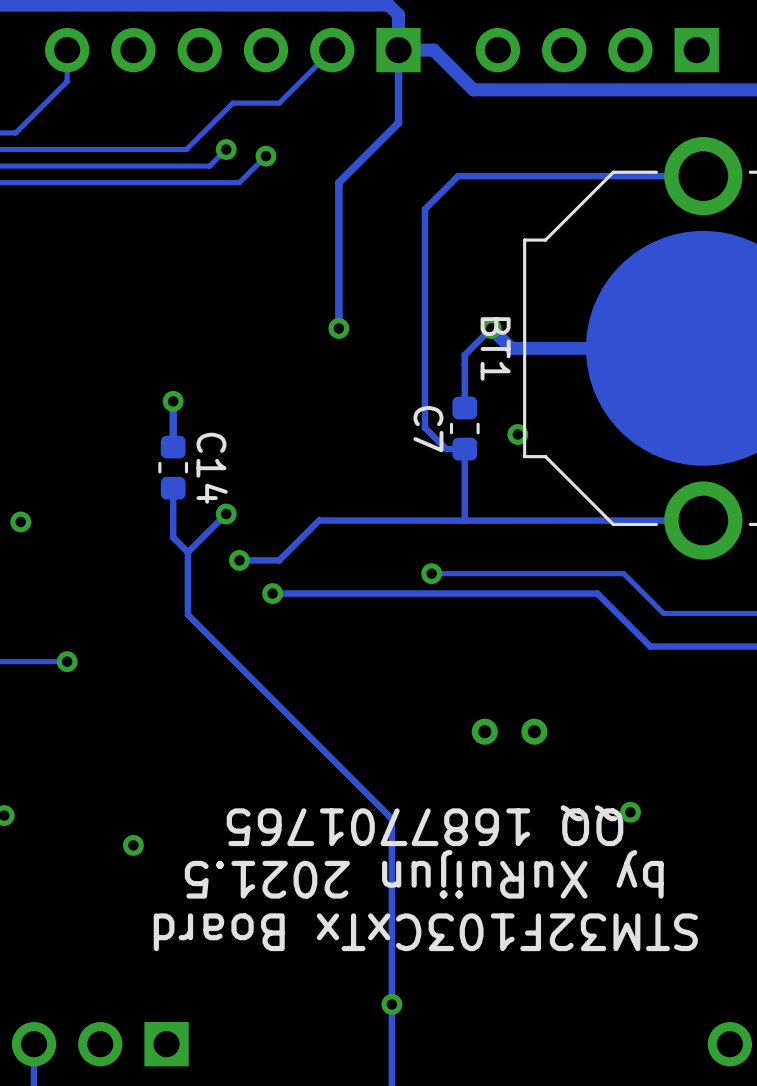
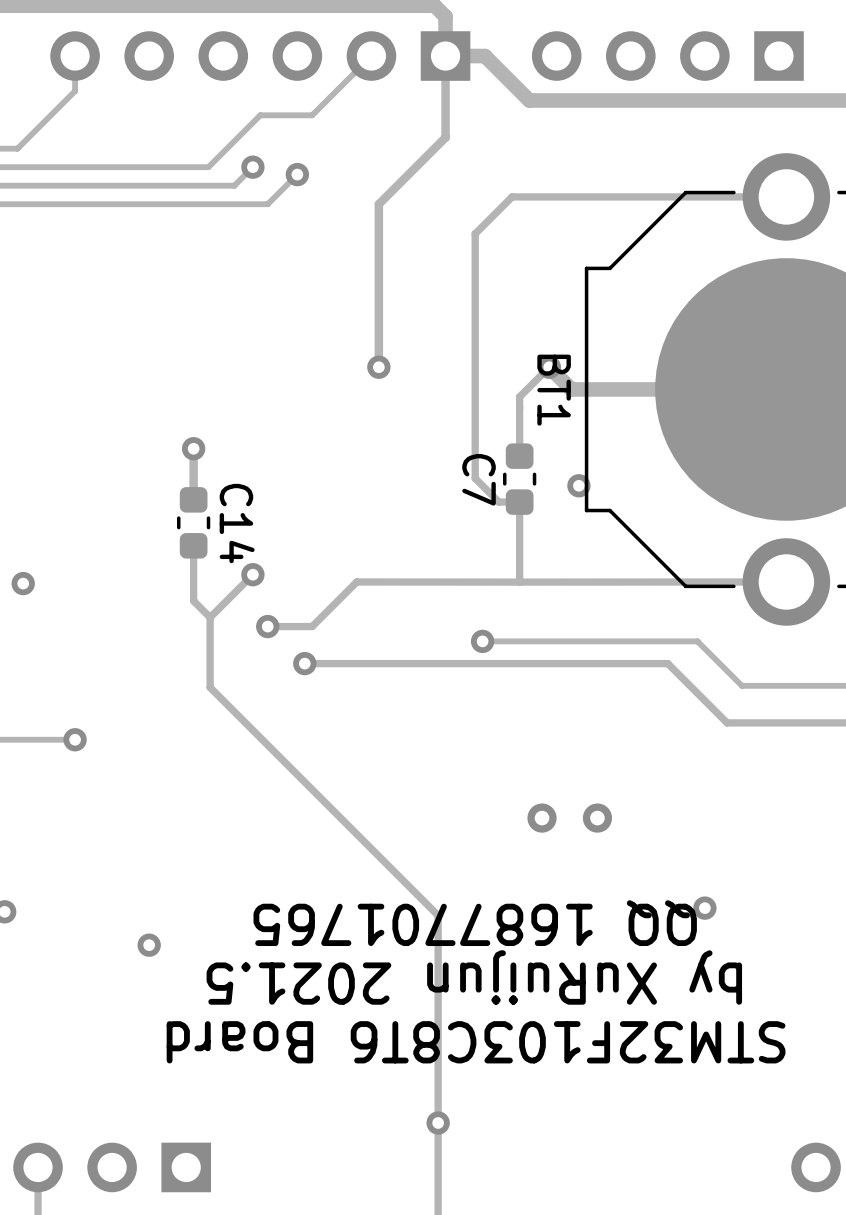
text: STM32F103CxTx Board (425, 932) -> STM32F103C8T6 Board (476, 1042)

